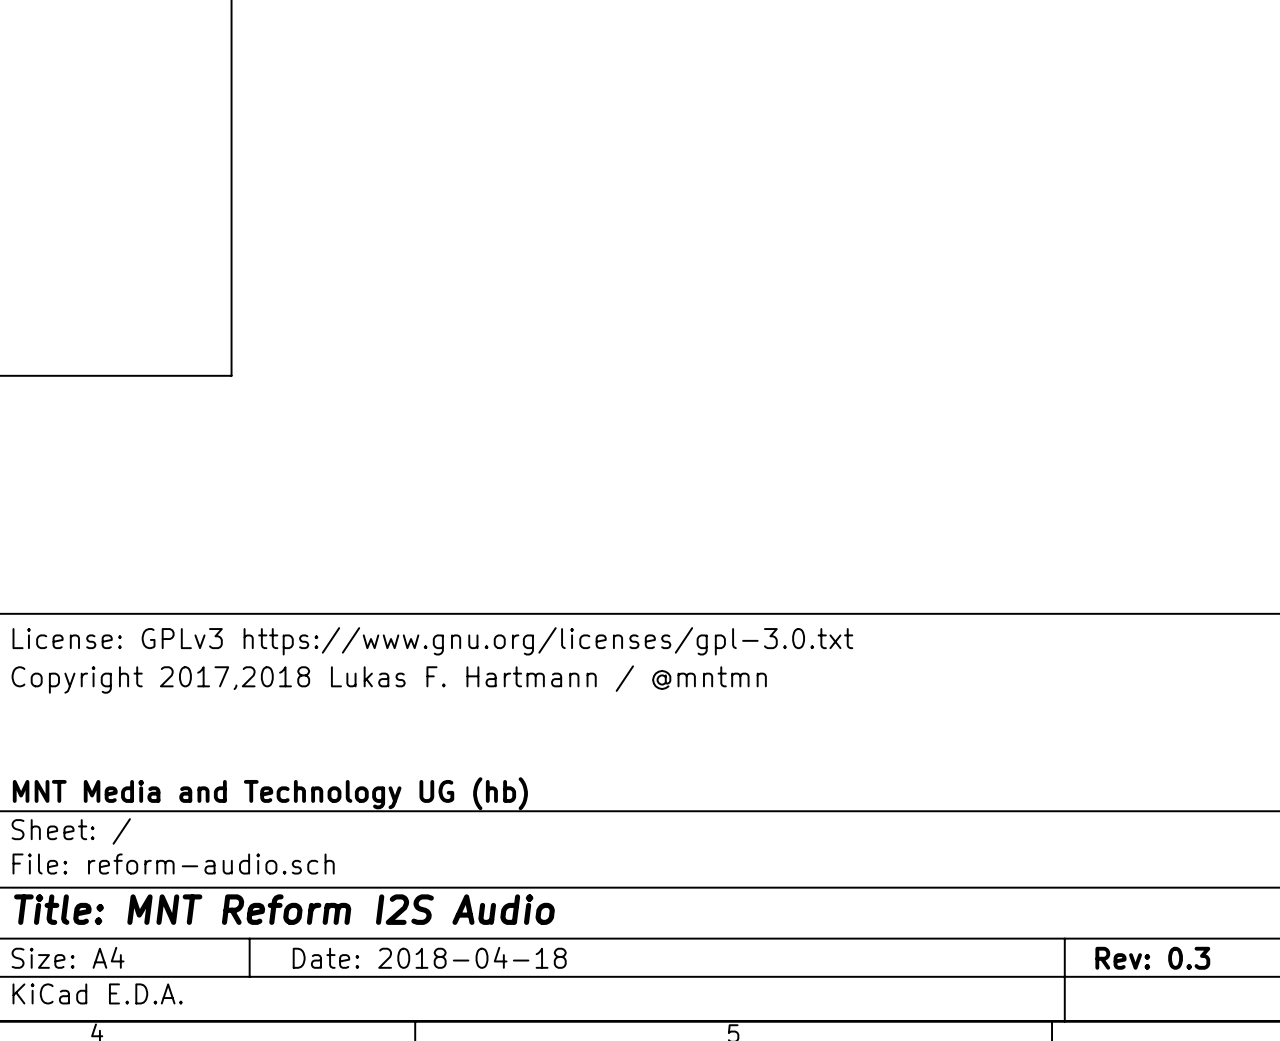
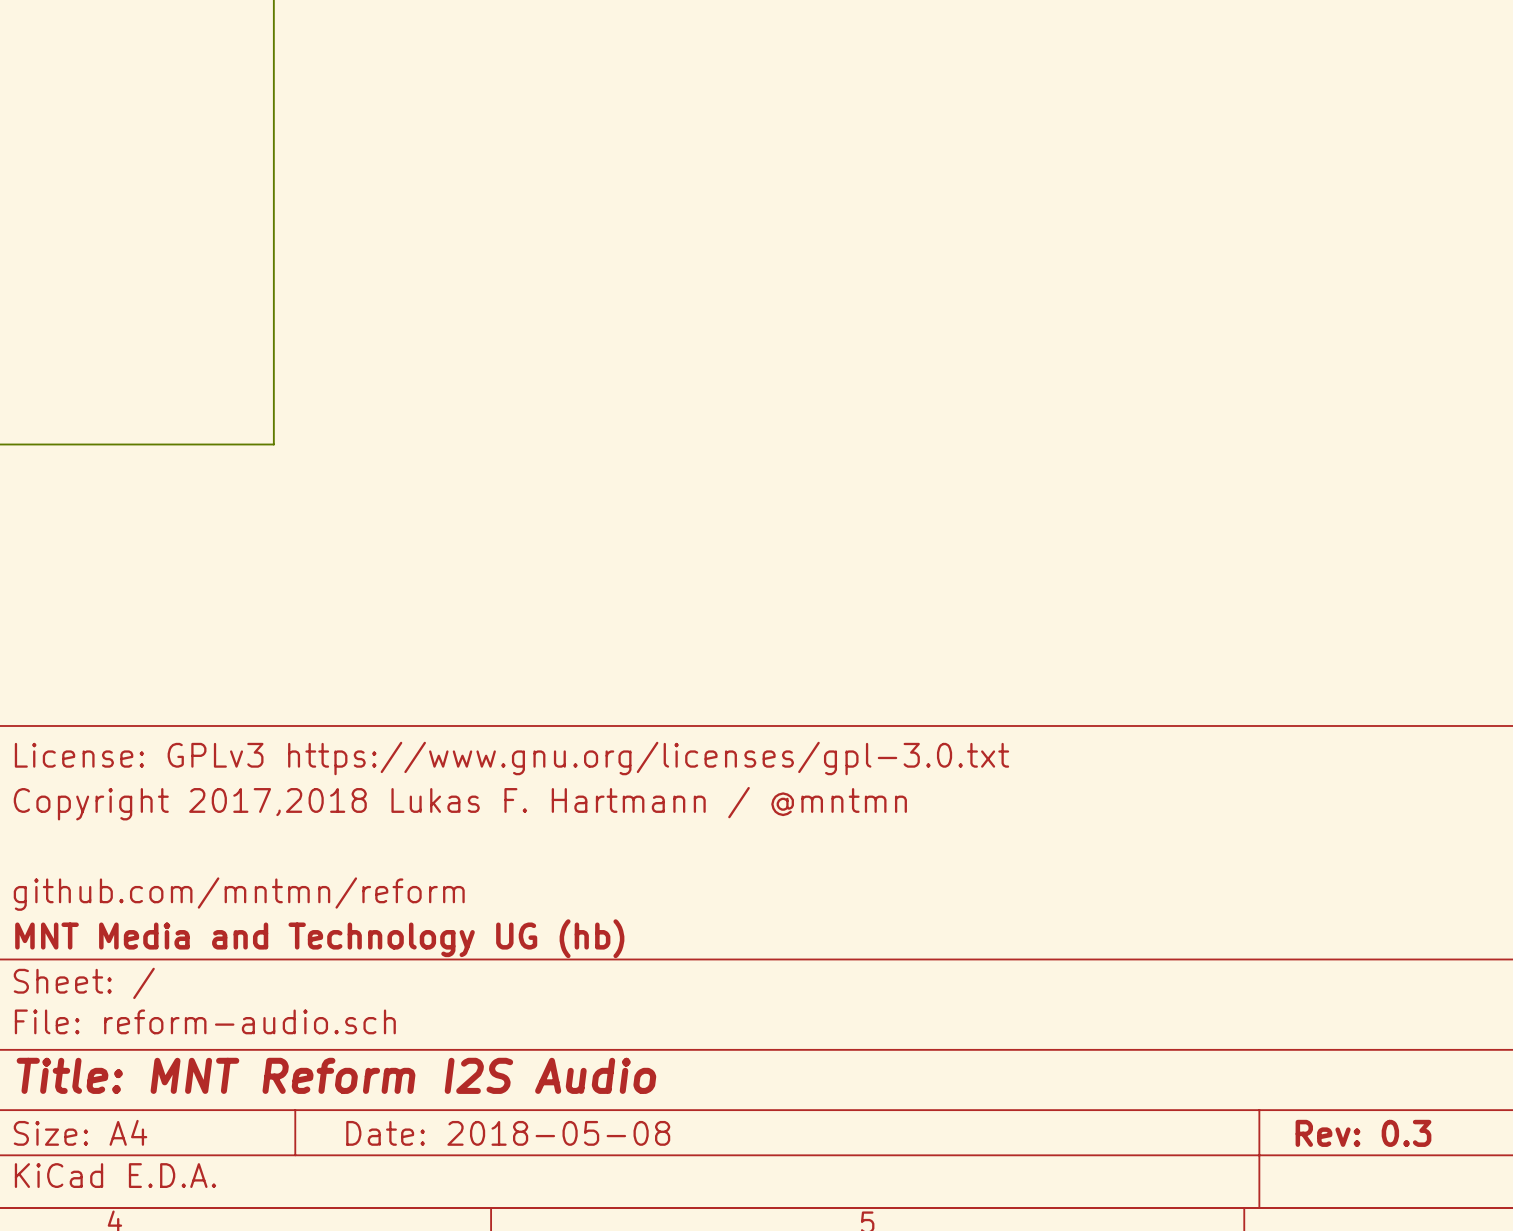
title block: none -> github.com/mntmn/reform (239, 894)
title block: Date: 2018-04-18 (429, 957) -> Date: 2018-05-08 (508, 1133)

